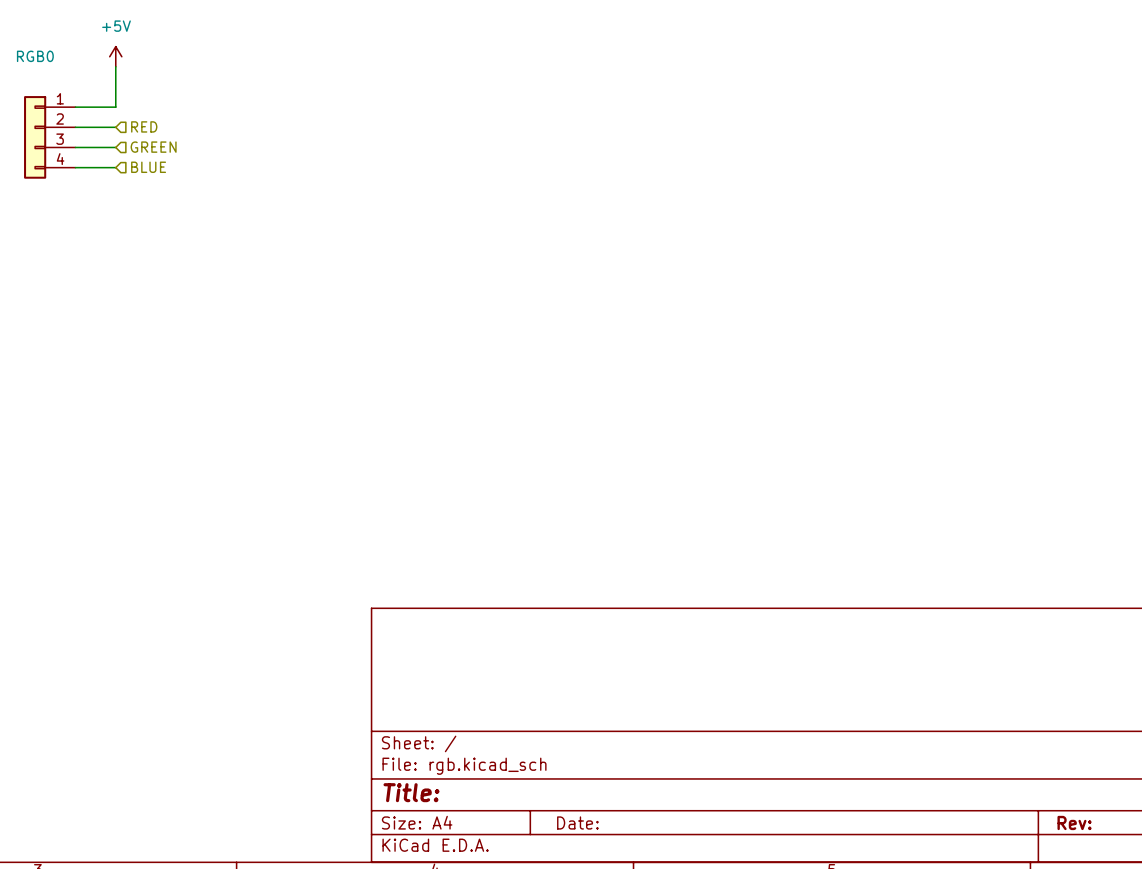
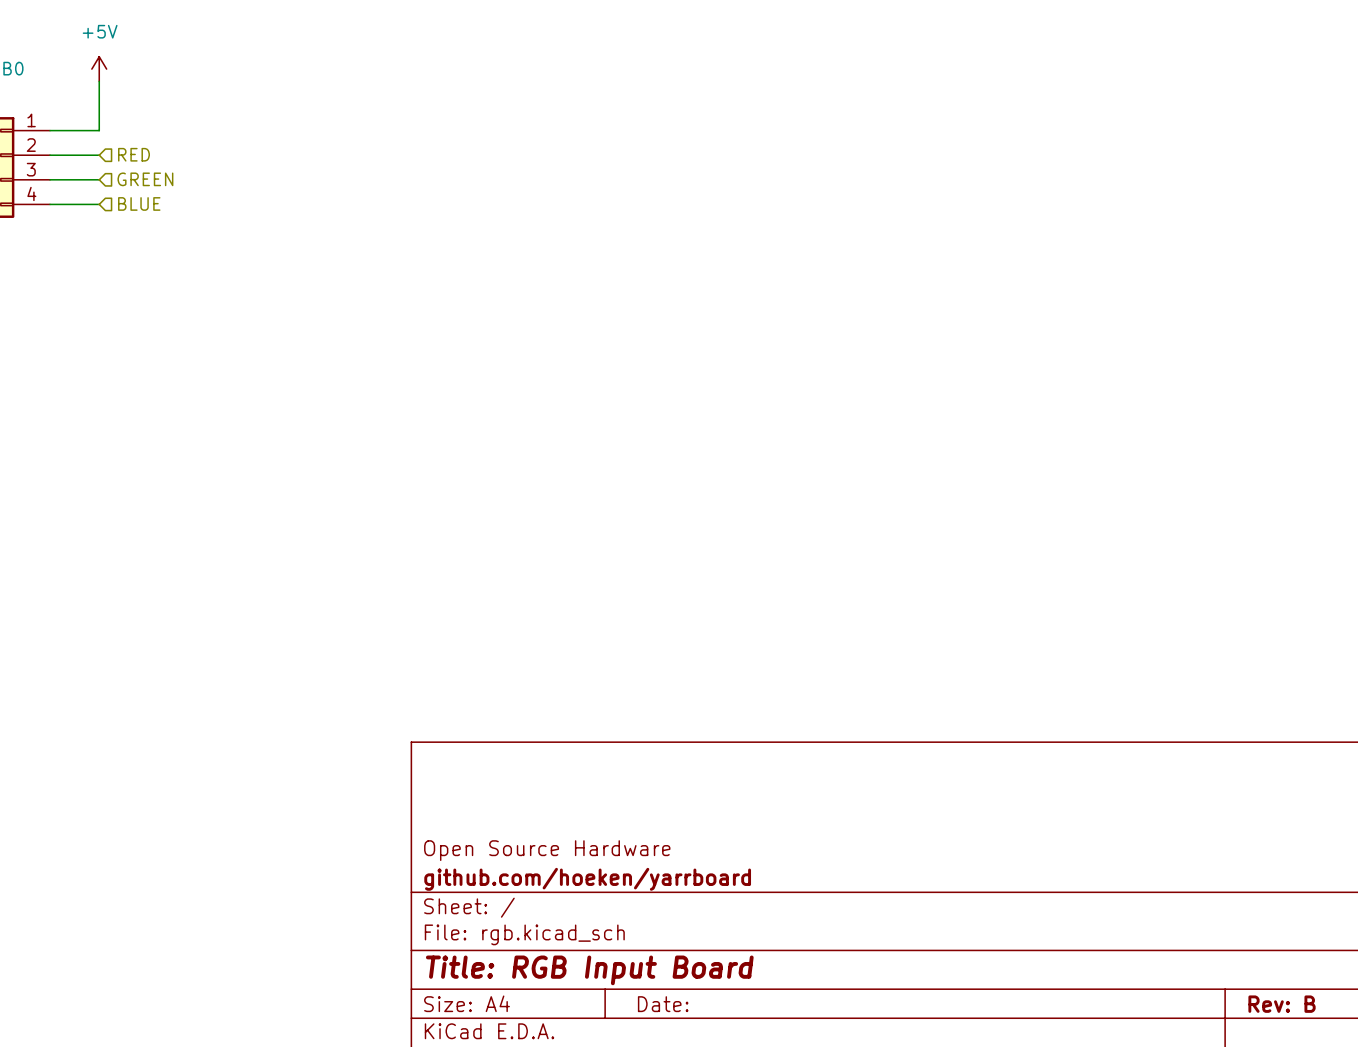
title block: none -> Open Source Hardware (547, 850)
title block: none -> github.com/hoeken/yarrboard (587, 879)
title block: Title: (411, 792) -> Title: RGB Input Board (589, 970)
title block: Rev: (1074, 822) -> Rev: B (1282, 1004)

